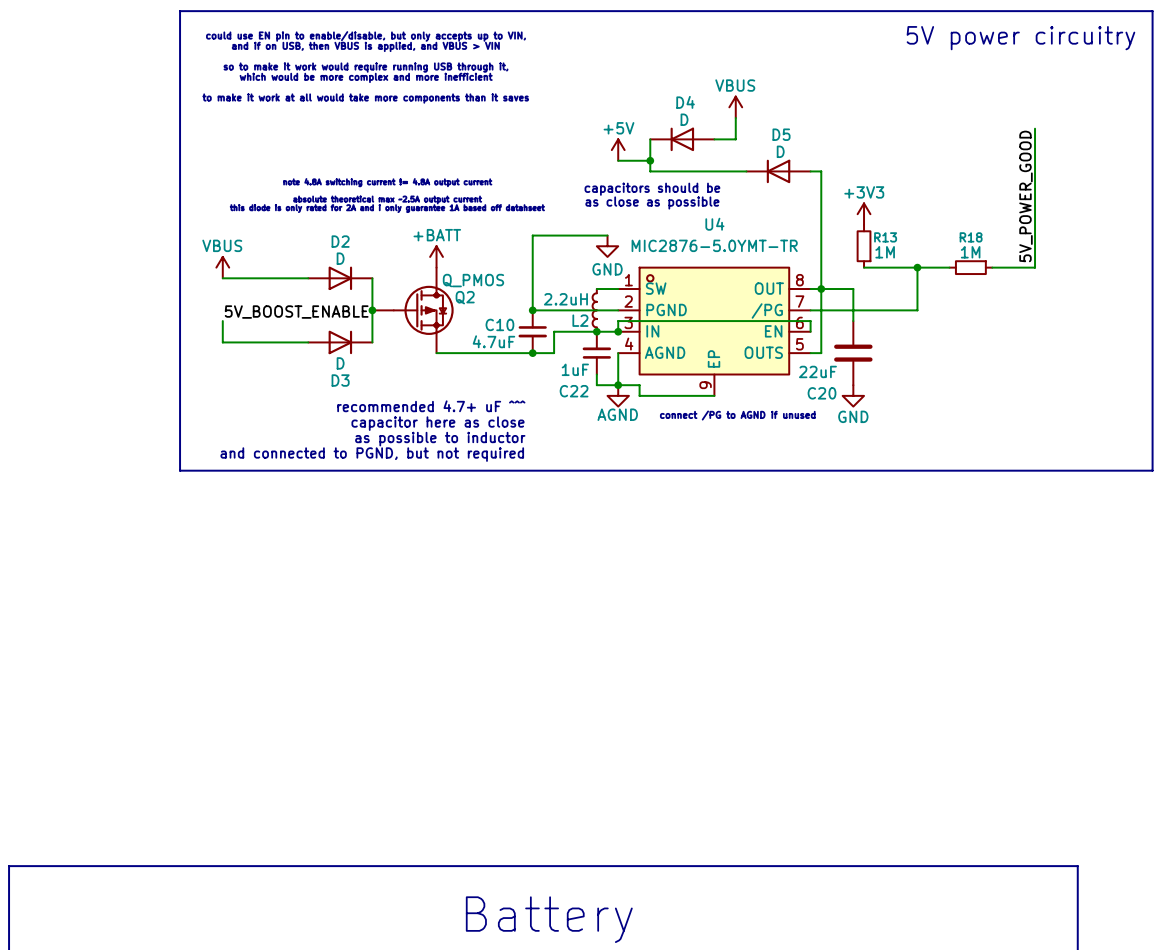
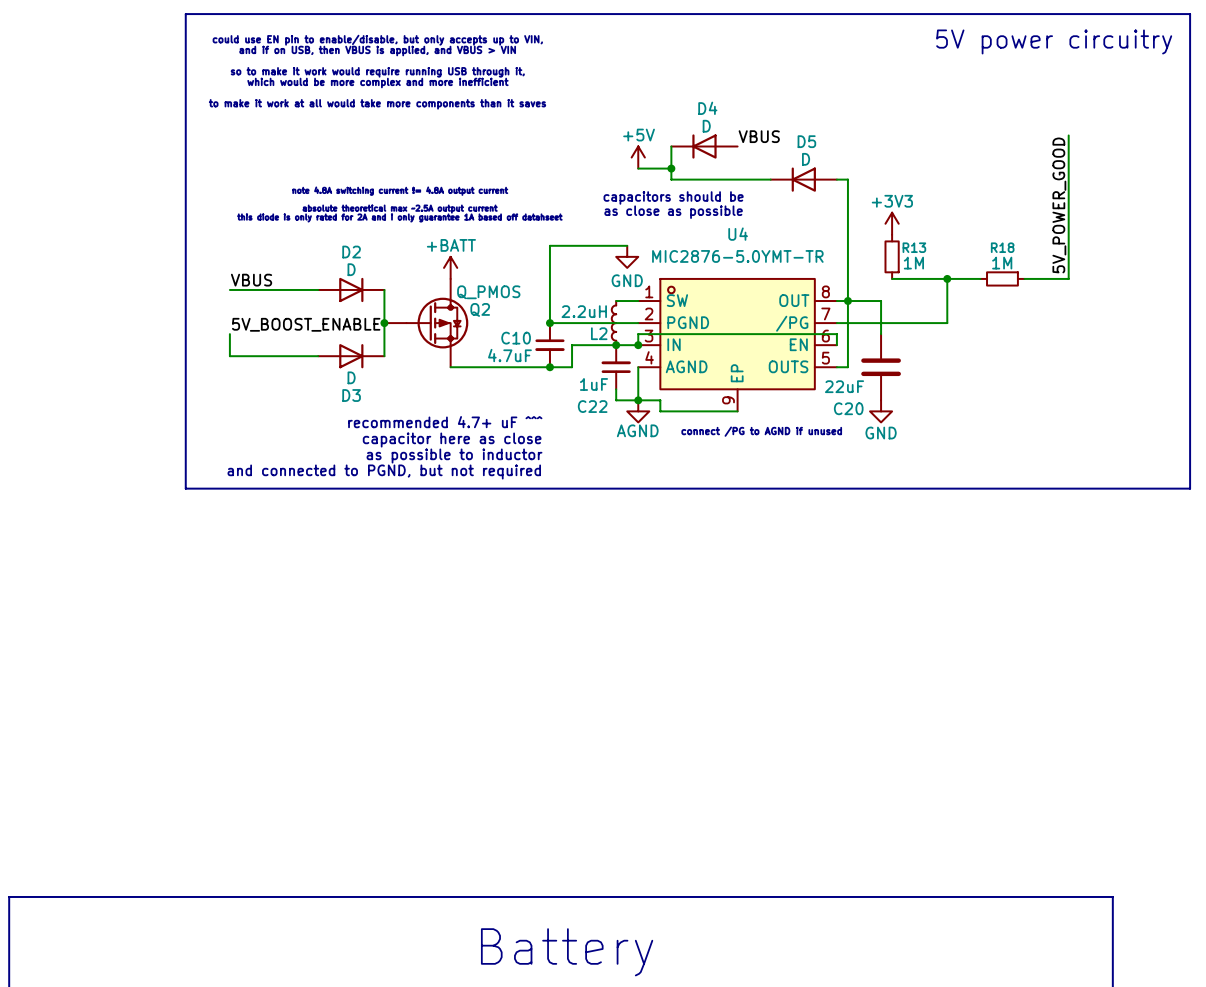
power symbol: VBUS (735, 107) -> none
wire: (735, 118) (735, 139) (714, 139) -> none
label: none -> VBUS (759, 136)
power symbol: VBUS (222, 267) -> none
label: none -> VBUS (251, 280)

